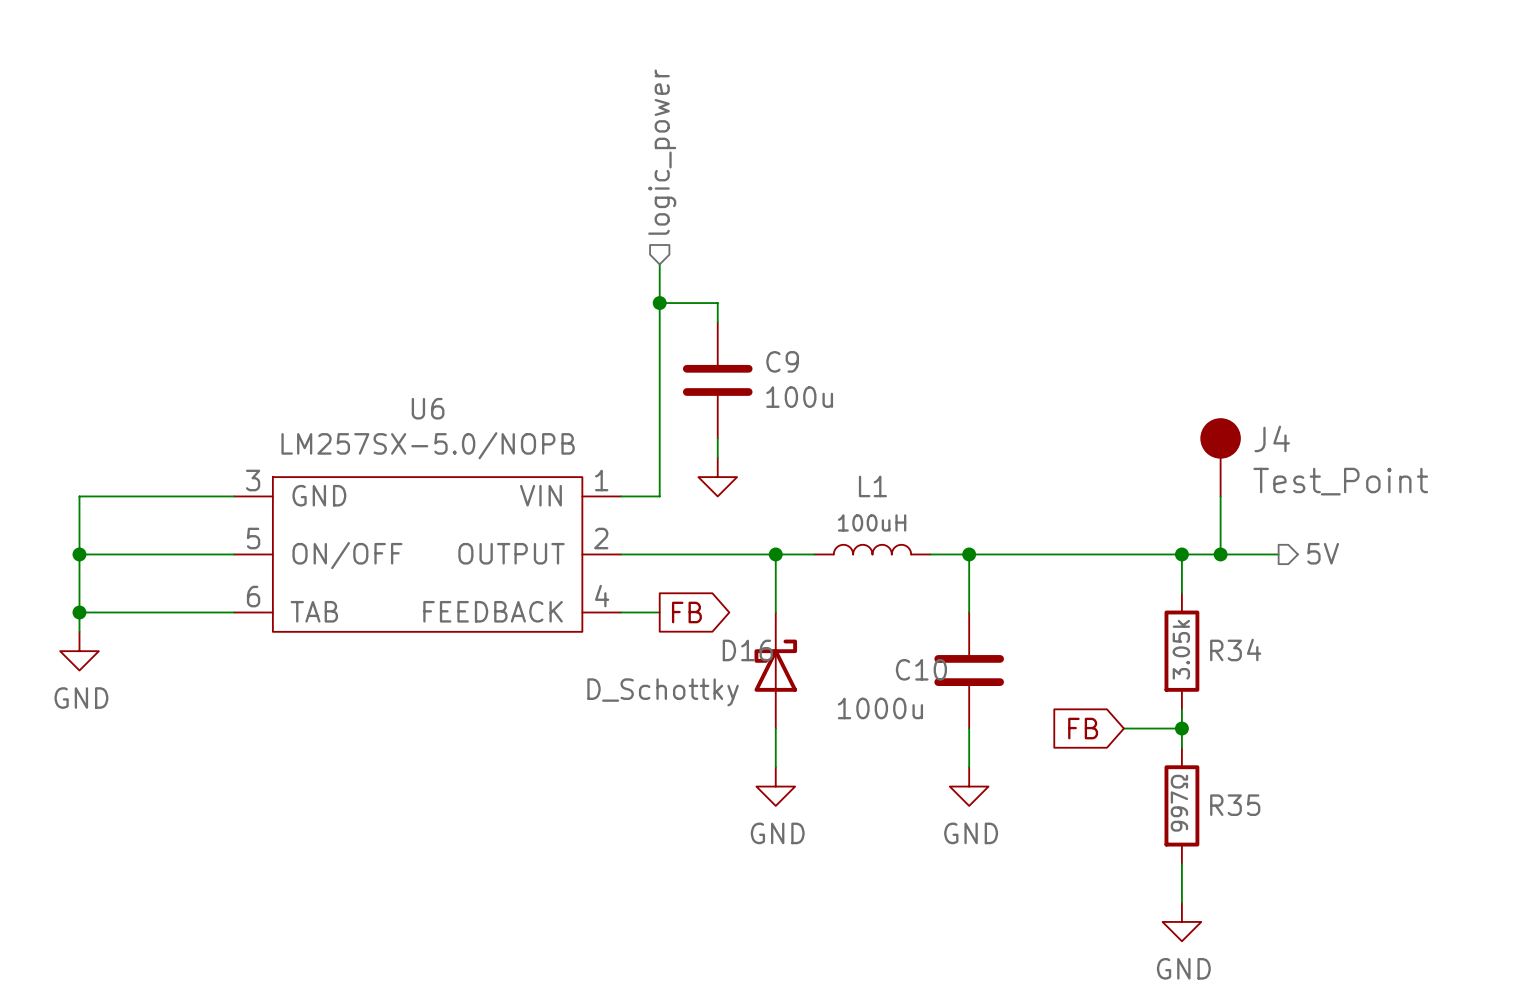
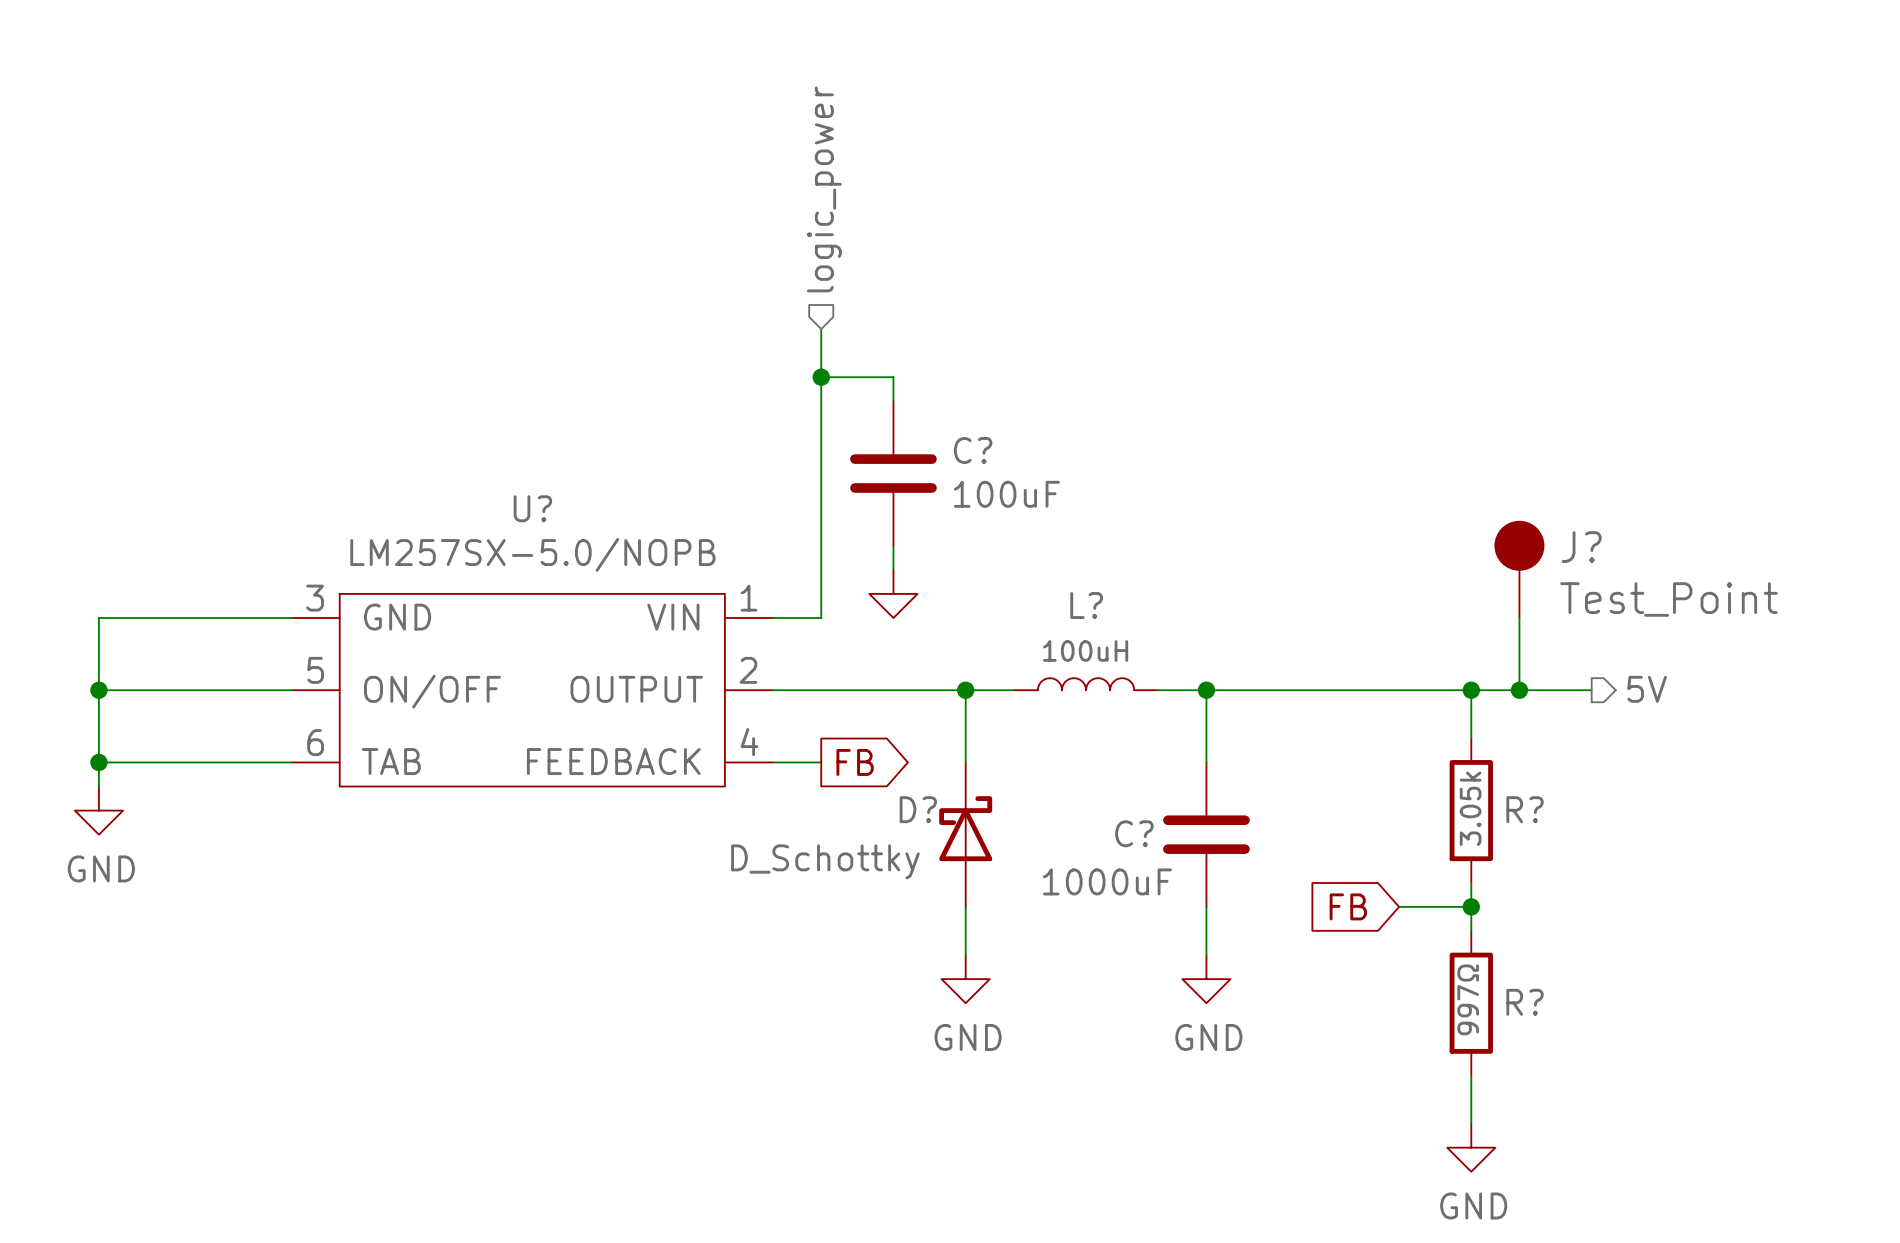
C9 name: C9 (782, 361) -> C? (973, 450)
C9 value: 100u (799, 397) -> 100uF (1006, 494)
U6 name: U6 (428, 408) -> U? (532, 508)
J4 name: J4 (1272, 438) -> J? (1581, 547)
L1 name: L1 (872, 486) -> L? (1086, 605)
R34 name: R34 (1235, 649) -> R? (1525, 809)
D16 name: D16 (747, 650) -> D? (918, 809)
C10 name: C10 (921, 669) -> C? (1134, 833)
C10 value: 1000u (880, 708) -> 1000uF (1107, 881)
R35 name: R35 (1235, 805) -> R? (1525, 1002)

